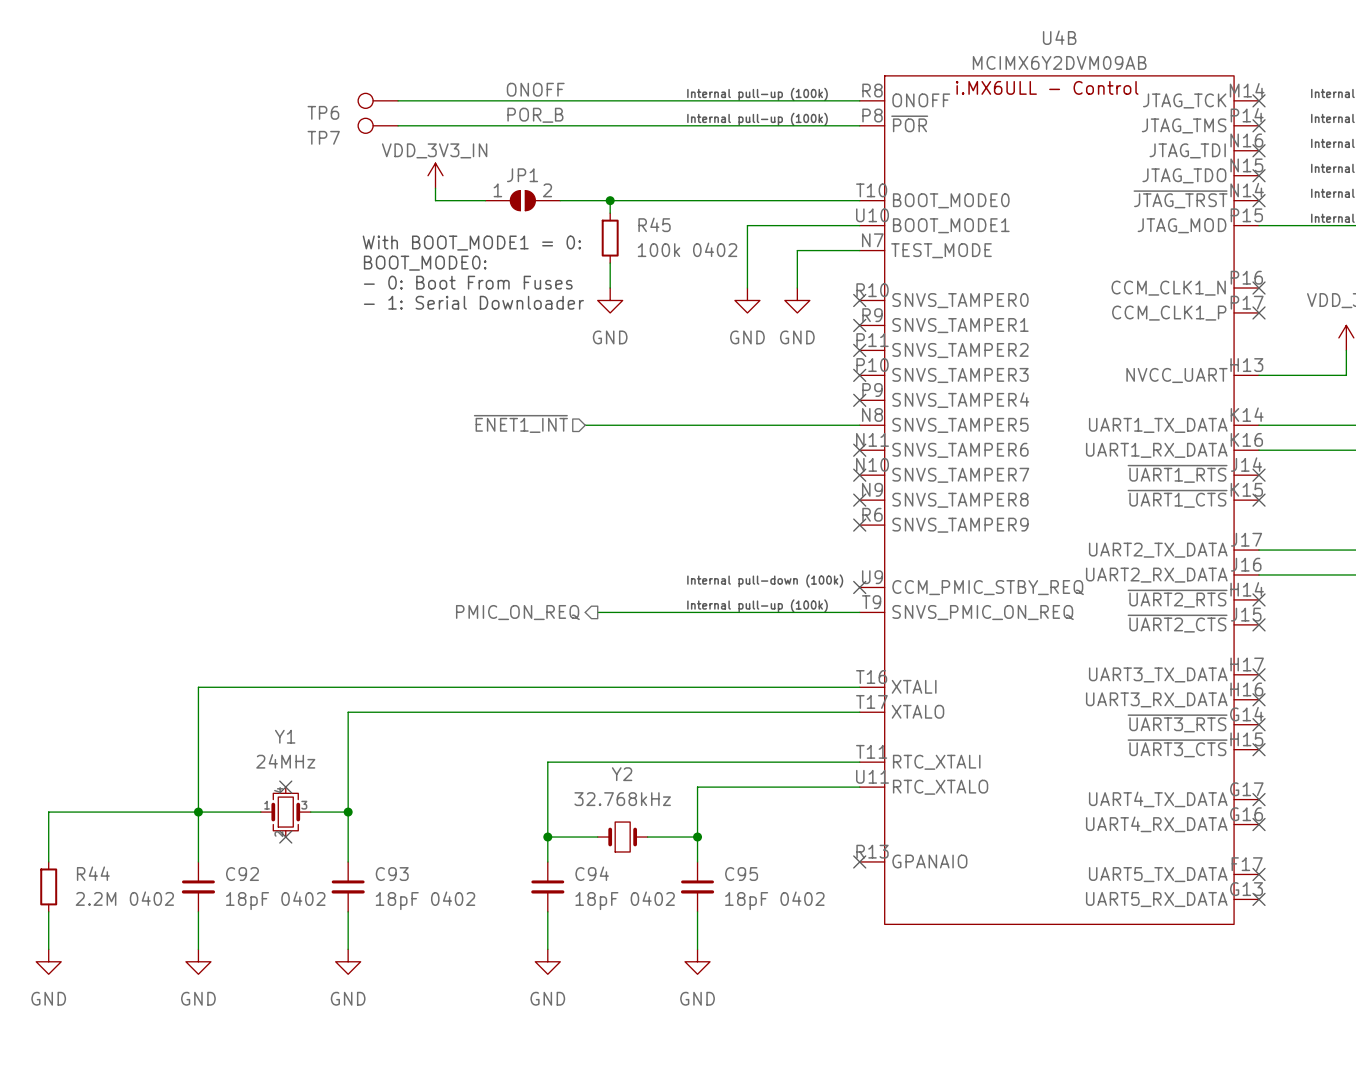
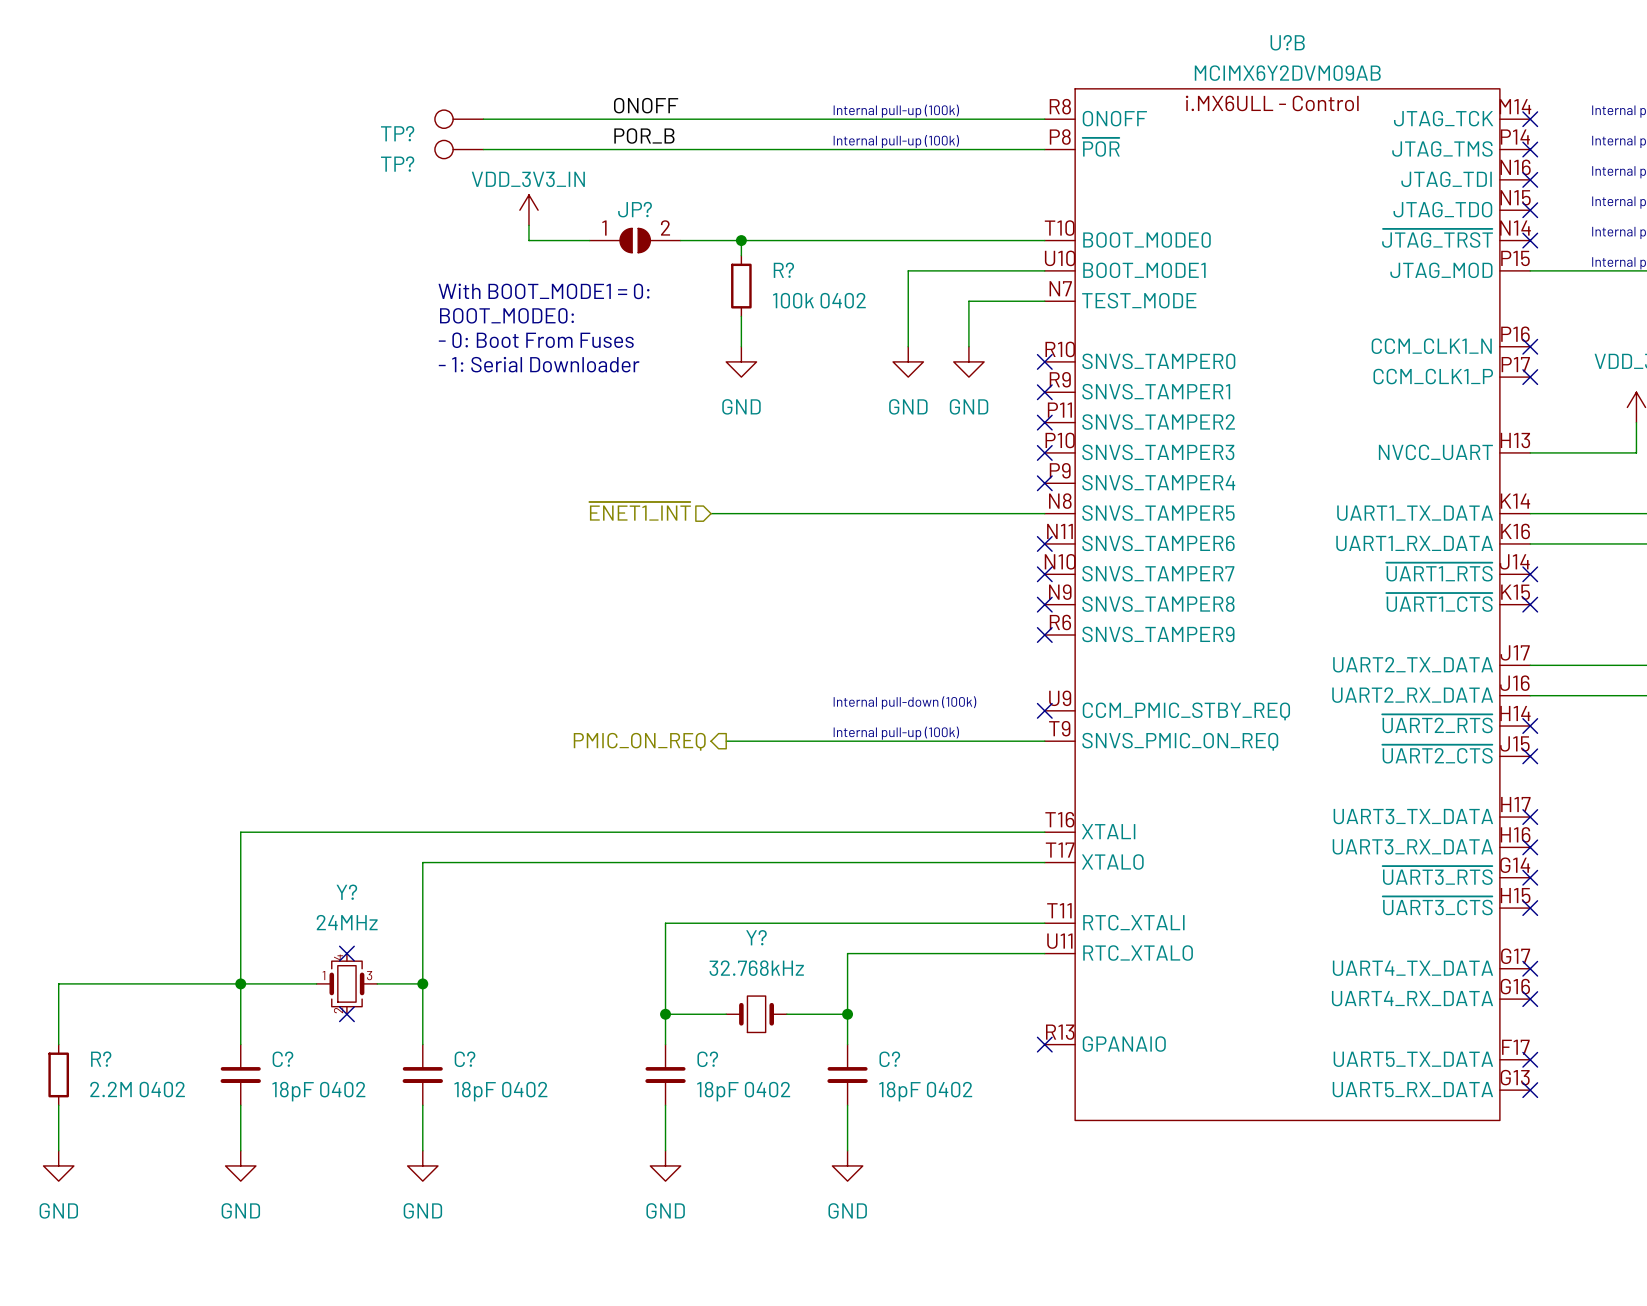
U4B name: U4B (1059, 37) -> U?B (1287, 42)
TP6 name: TP6 (323, 112) -> TP? (397, 133)
TP7 name: TP7 (323, 137) -> TP? (397, 164)
JP1 name: JP1 (522, 175) -> JP? (635, 209)
R45 name: R45 (654, 224) -> R? (783, 270)
Y1 name: Y1 (285, 736) -> Y? (346, 892)
Y2 name: Y2 (622, 774) -> Y? (756, 937)
R44 name: R44 (93, 873) -> R? (101, 1059)
C94 name: C94 (592, 873) -> C? (707, 1059)
C92 name: C92 (242, 874) -> C? (282, 1059)
C93 name: C93 (392, 874) -> C? (465, 1059)
C95 name: C95 (741, 874) -> C? (889, 1059)

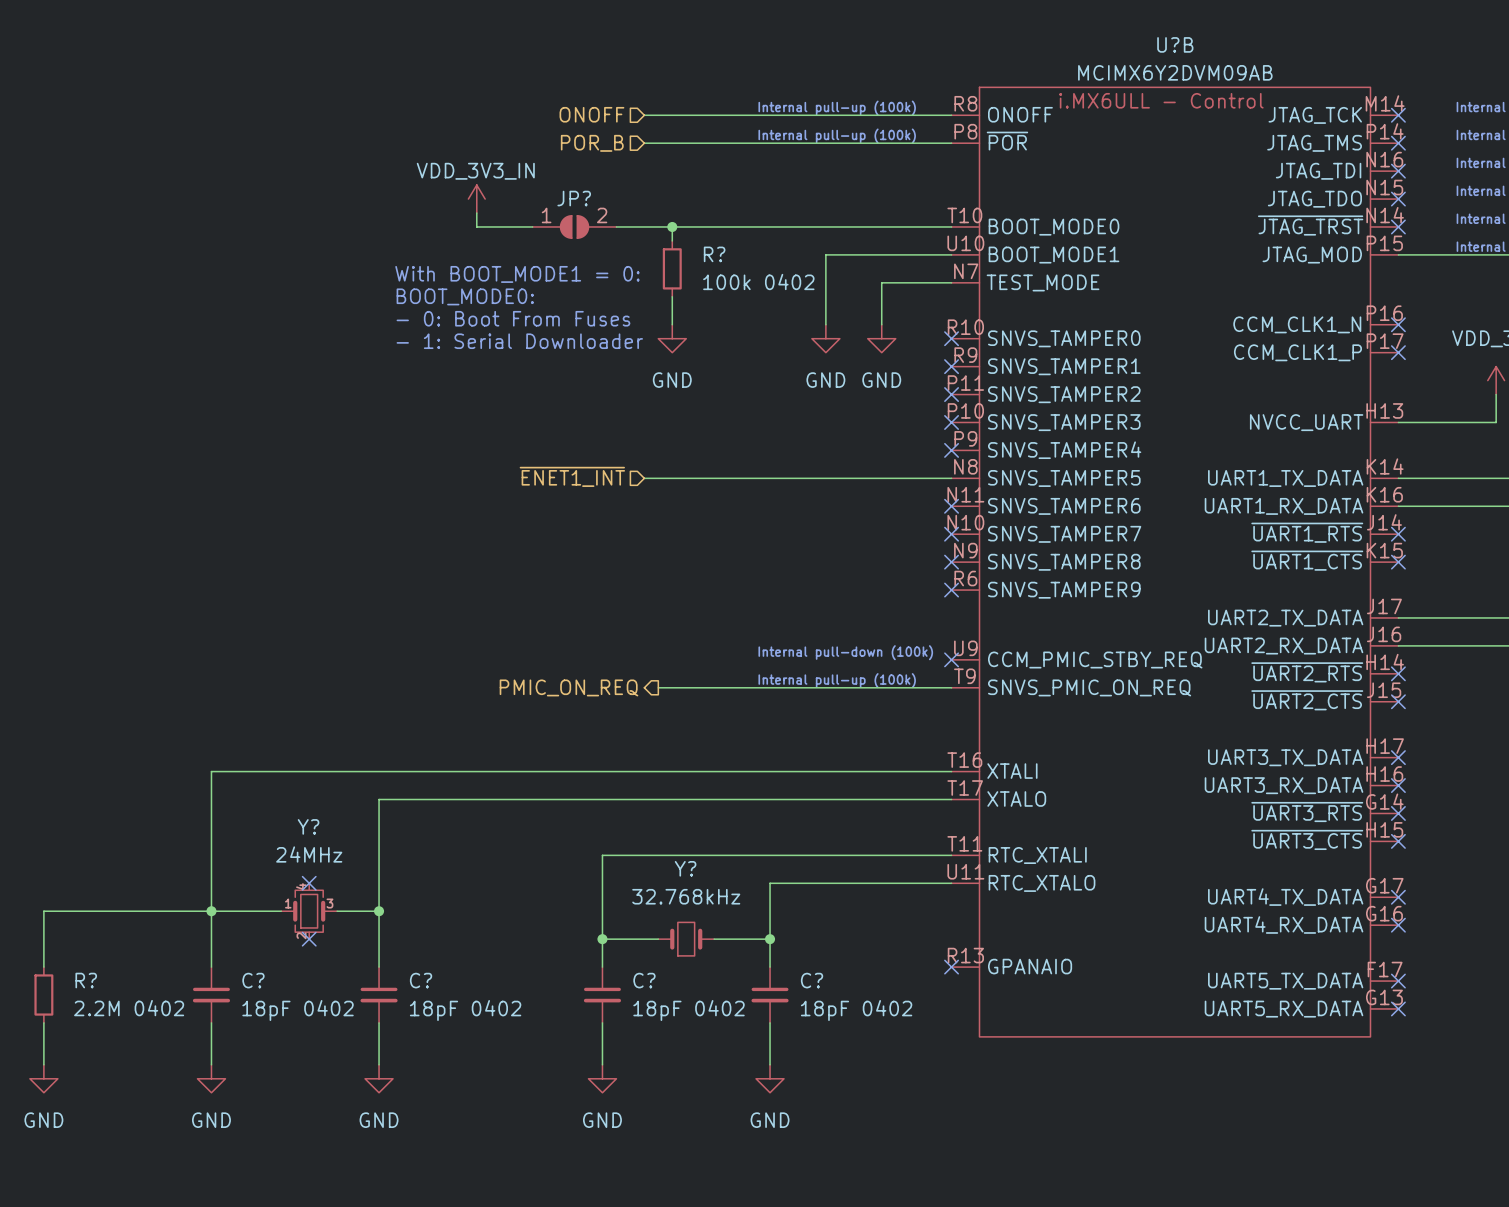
label: ONOFF (646, 105) -> none
hierarchical label: none -> ONOFF (591, 114)
TP?: (459, 119) -> none
wire: (483, 119) (711, 119) -> none
label: POR_B (644, 135) -> none
hierarchical label: none -> POR_B (592, 143)
TP?: (459, 149) -> none
wire: (483, 149) (711, 149) -> none

